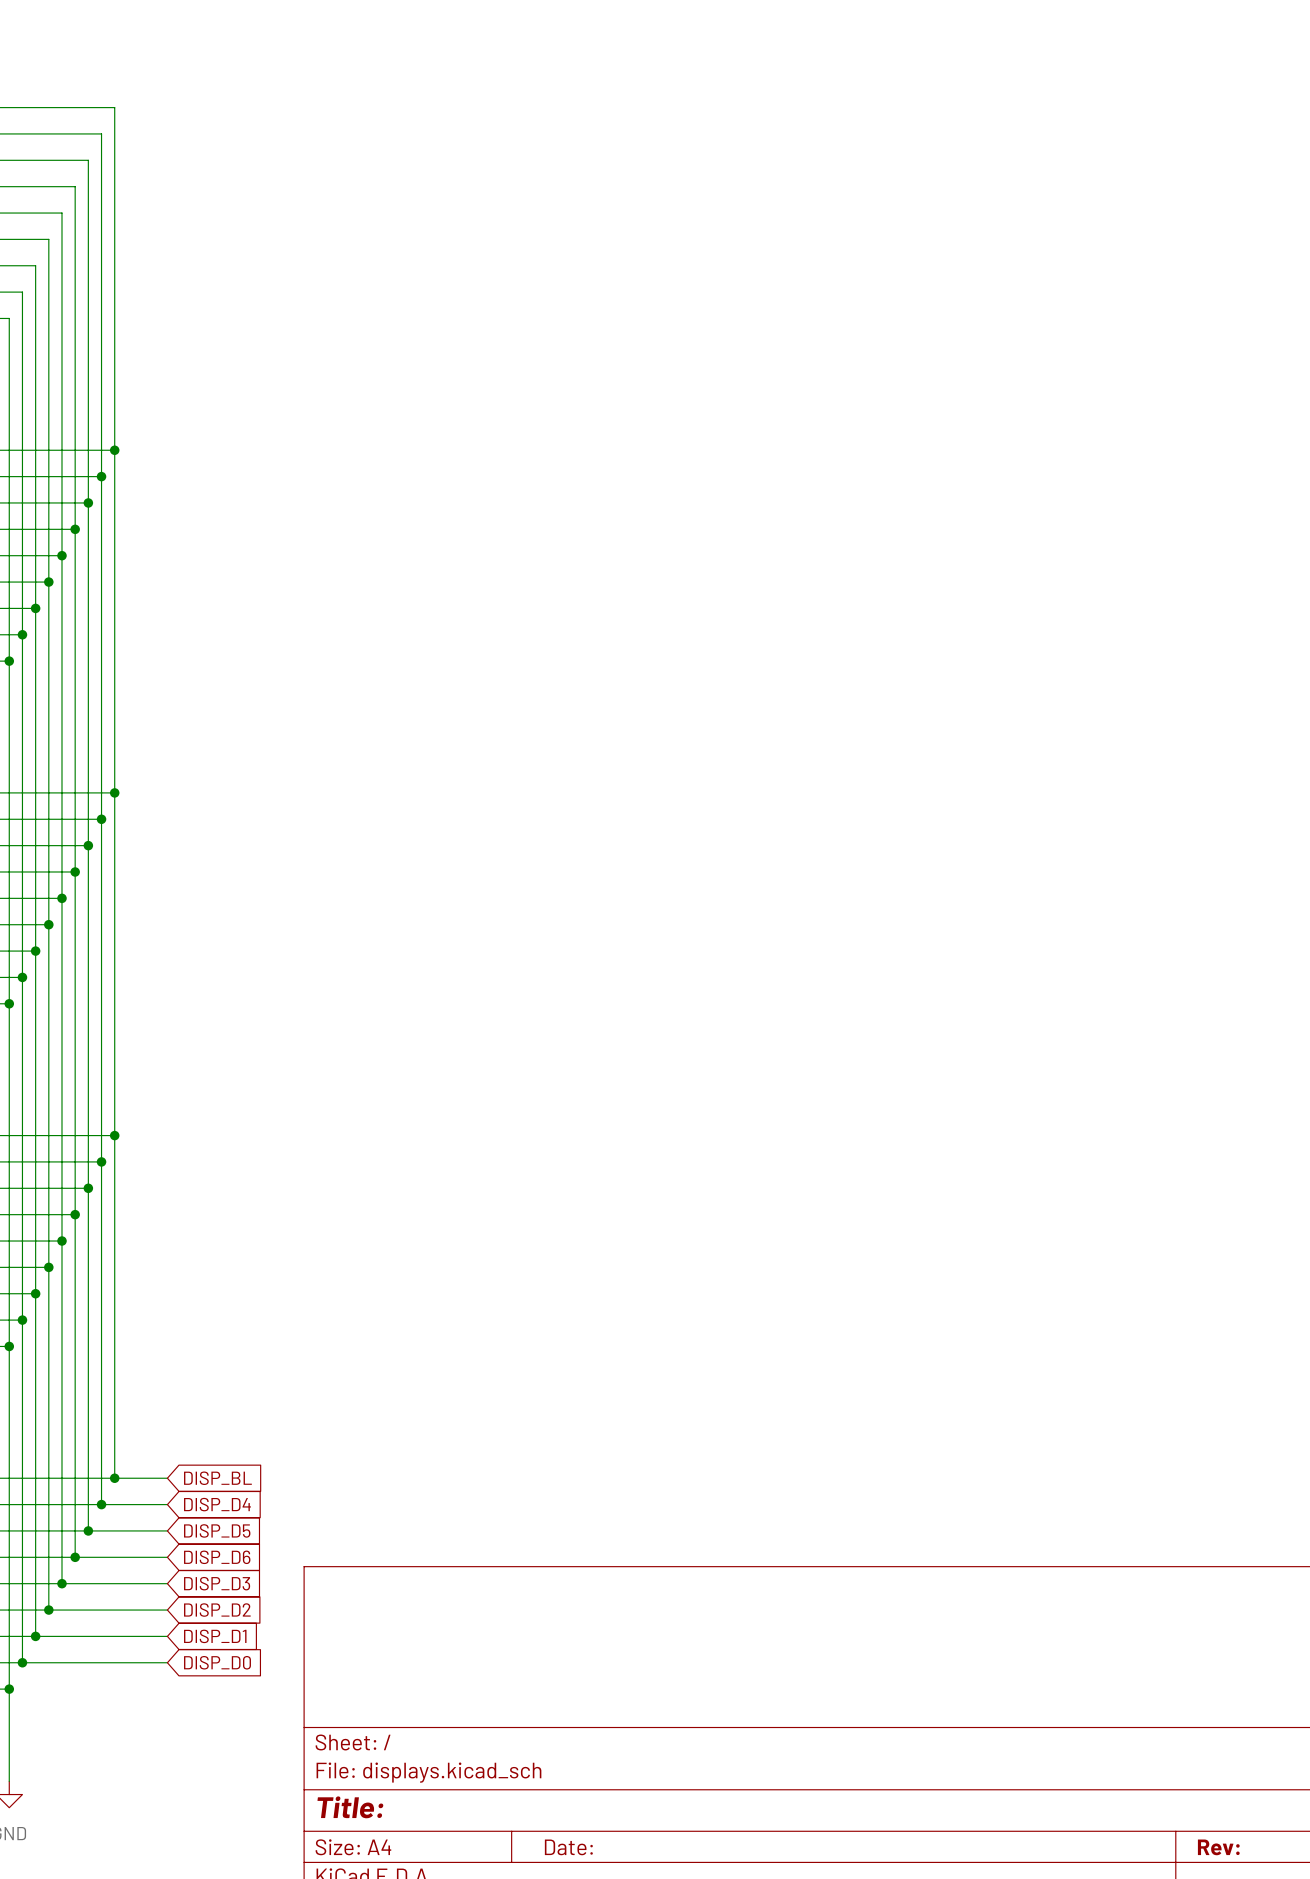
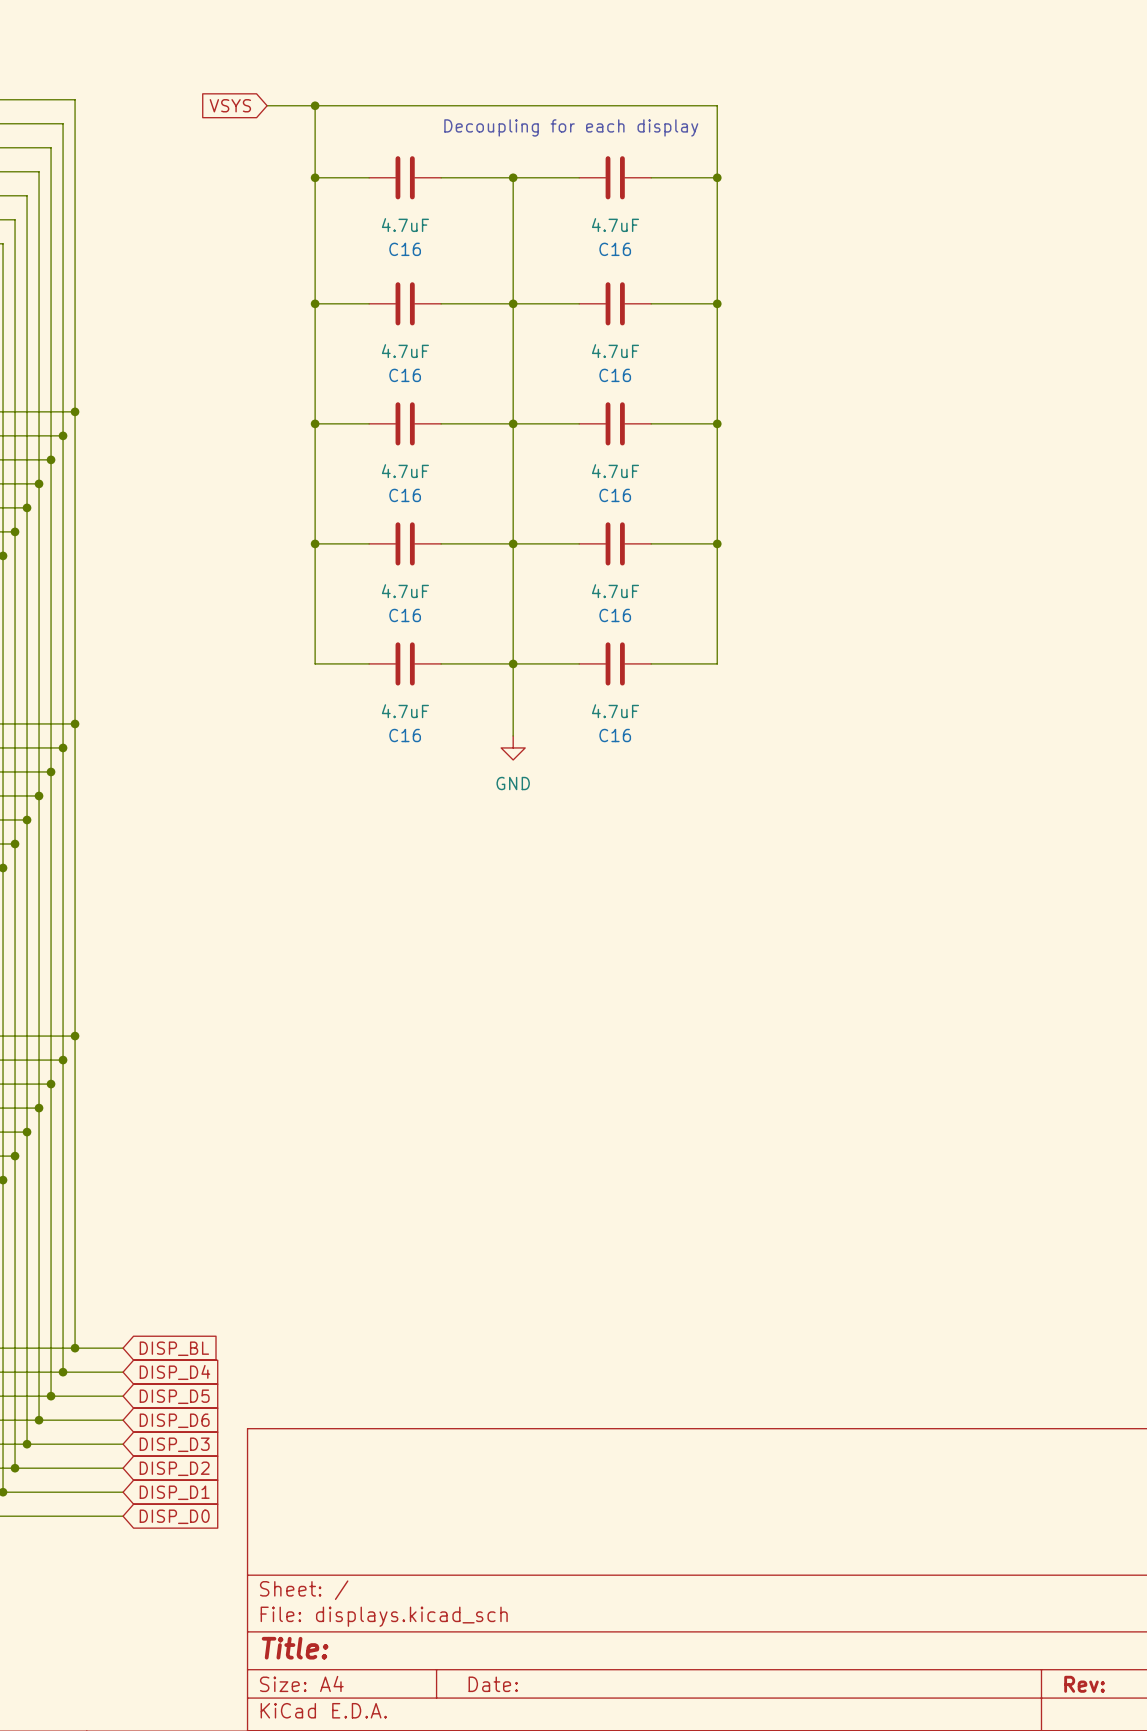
global label: none -> VSYS (230, 105)
wire: none -> (267, 105) (717, 105) (717, 663) (651, 663)
wire: none -> (315, 105) (315, 663) (369, 663)
junction: none -> (315, 105)
text: none -> Decoupling for each display (571, 127)
wire: none -> (315, 177) (369, 177)
junction: none -> (315, 177)
C16: none -> 4.7uF (405, 177)
wire: none -> (441, 177) (579, 177)
wire: none -> (513, 177) (513, 735)
junction: none -> (513, 177)
C16: none -> 4.7uF (615, 177)
wire: none -> (651, 177) (717, 177)
junction: none -> (717, 177)
wire: none -> (315, 303) (369, 303)
junction: none -> (315, 303)
C16: none -> 4.7uF (405, 303)
wire: none -> (441, 303) (579, 303)
junction: none -> (513, 303)
C16: none -> 4.7uF (615, 303)
wire: none -> (651, 303) (717, 303)
junction: none -> (717, 303)
wire: none -> (315, 423) (369, 423)
junction: none -> (315, 423)
C16: none -> 4.7uF (405, 423)
wire: none -> (441, 423) (579, 423)
junction: none -> (513, 423)
C16: none -> 4.7uF (615, 423)
wire: none -> (651, 423) (717, 423)
junction: none -> (717, 423)
wire: none -> (315, 543) (369, 543)
junction: none -> (315, 543)
C16: none -> 4.7uF (405, 543)
wire: none -> (441, 543) (579, 543)
junction: none -> (513, 543)
C16: none -> 4.7uF (615, 543)
wire: none -> (651, 543) (717, 543)
junction: none -> (717, 543)
C16: none -> 4.7uF (405, 663)
wire: none -> (441, 663) (579, 663)
junction: none -> (513, 663)
C16: none -> 4.7uF (615, 663)
power symbol: none -> GND (513, 747)

